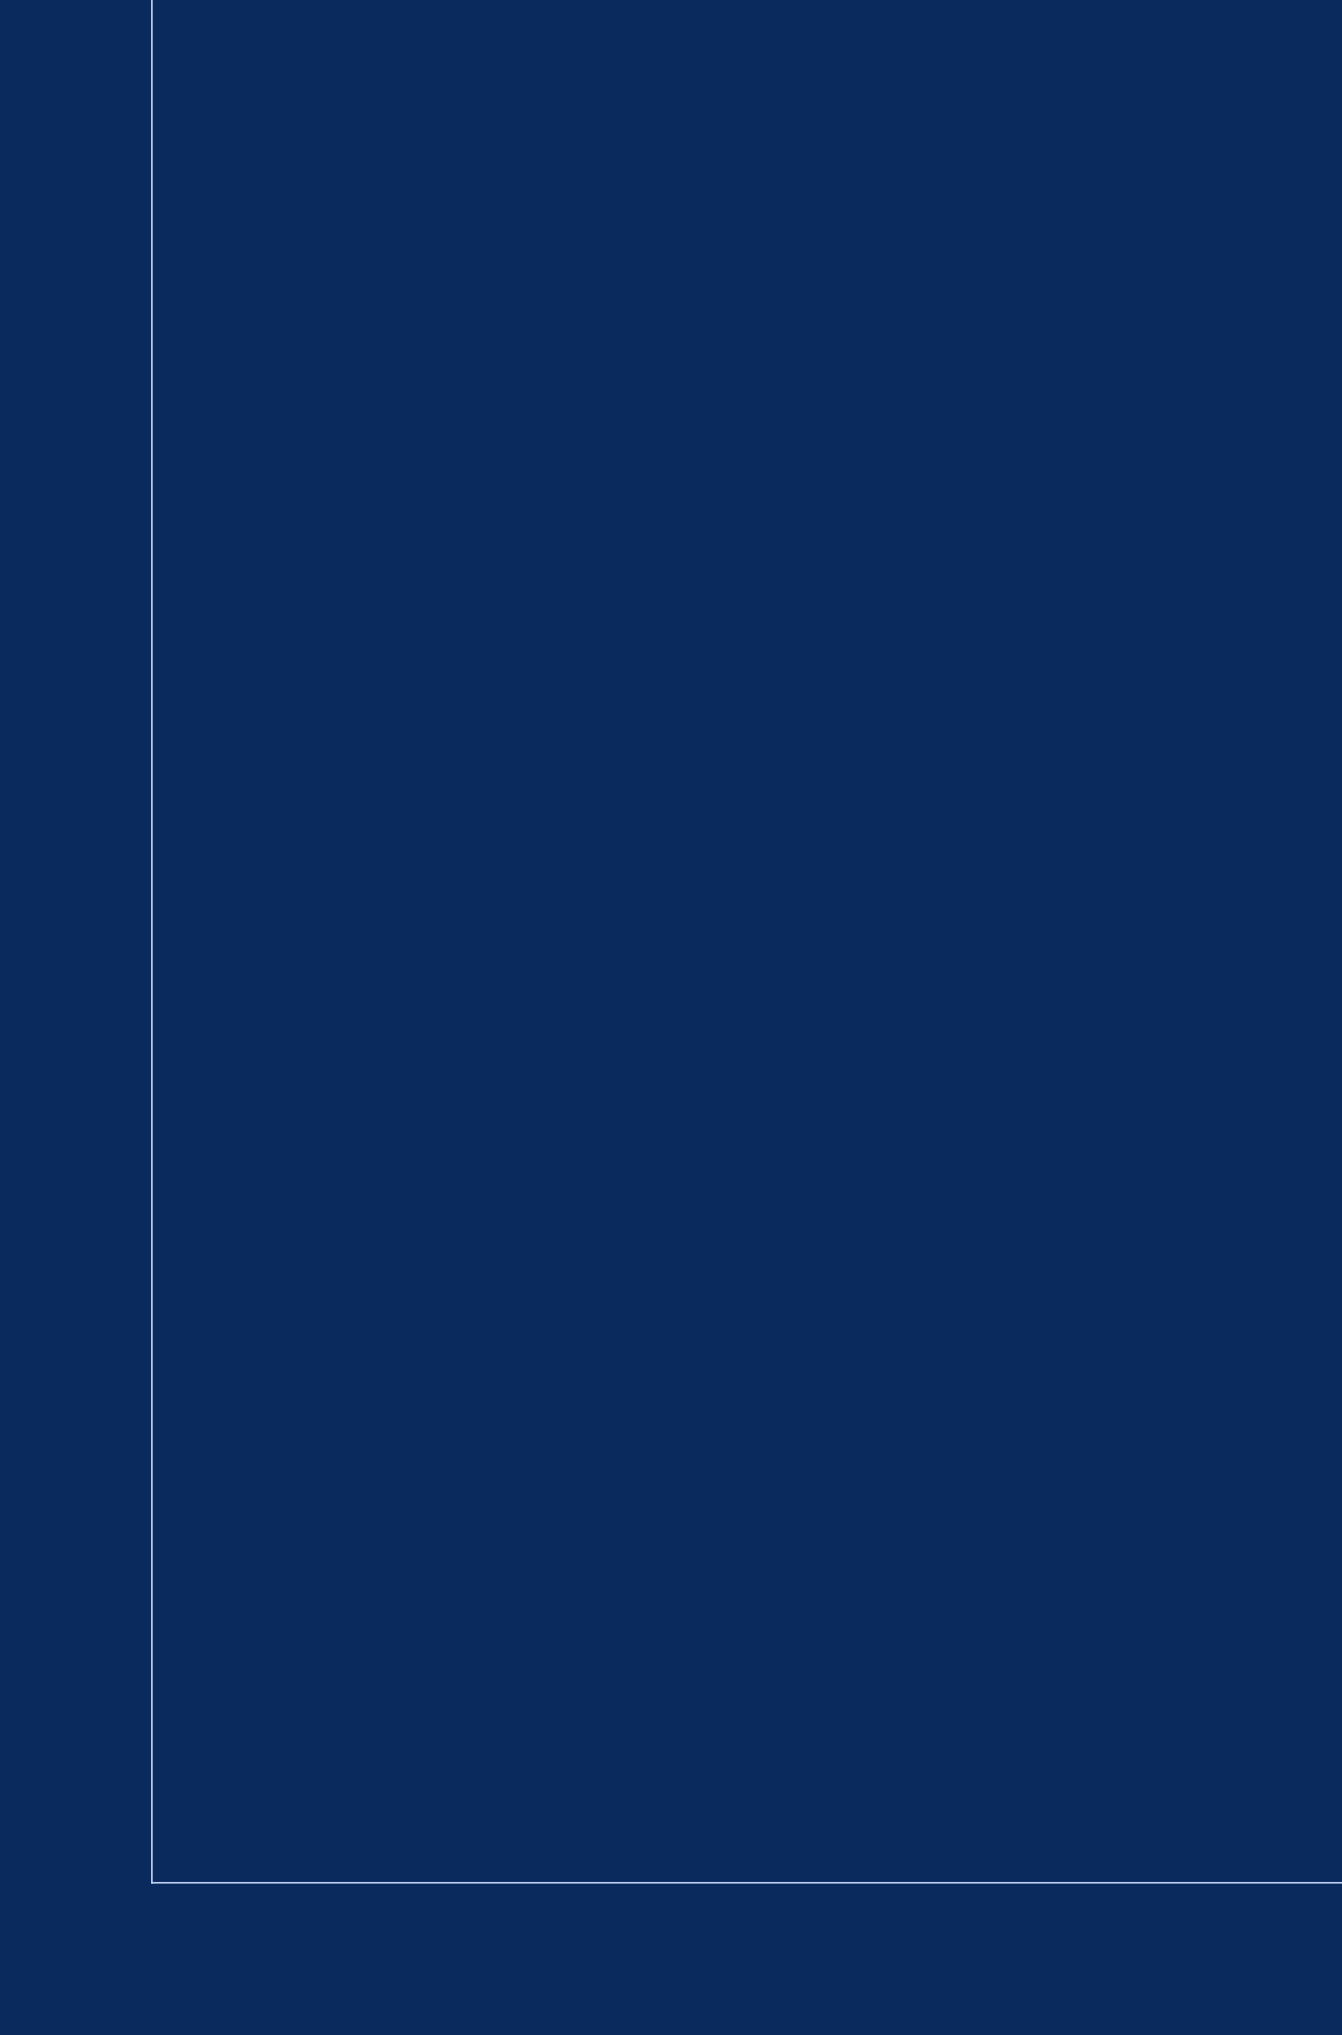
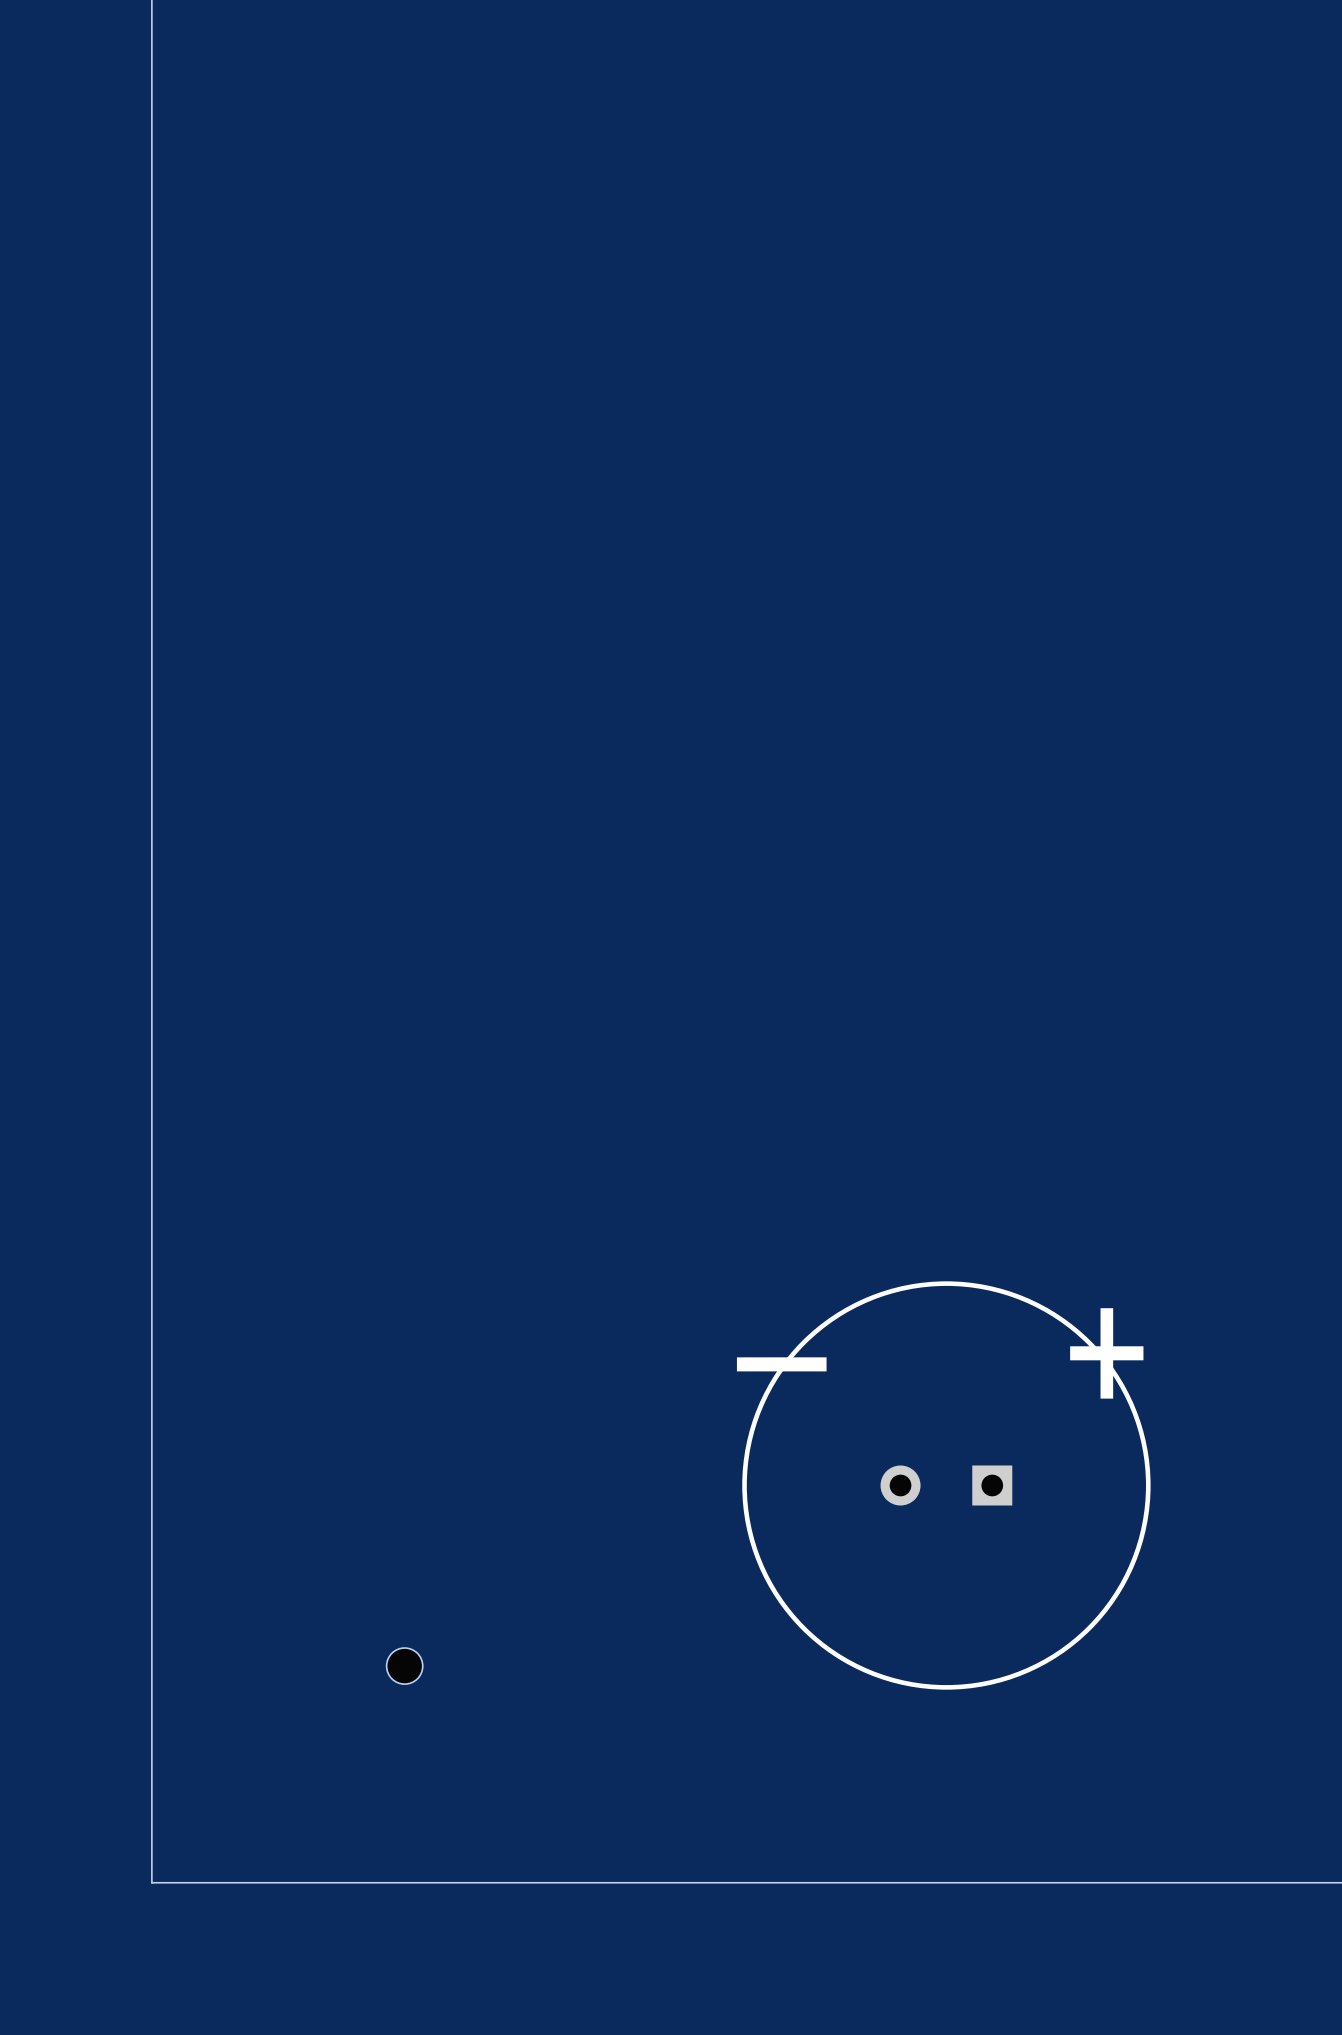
text: none -> + (1106, 1353)
text: none -> _ (781, 1364)
part: none -> (946, 1485)
hole: none -> (404, 1666)

